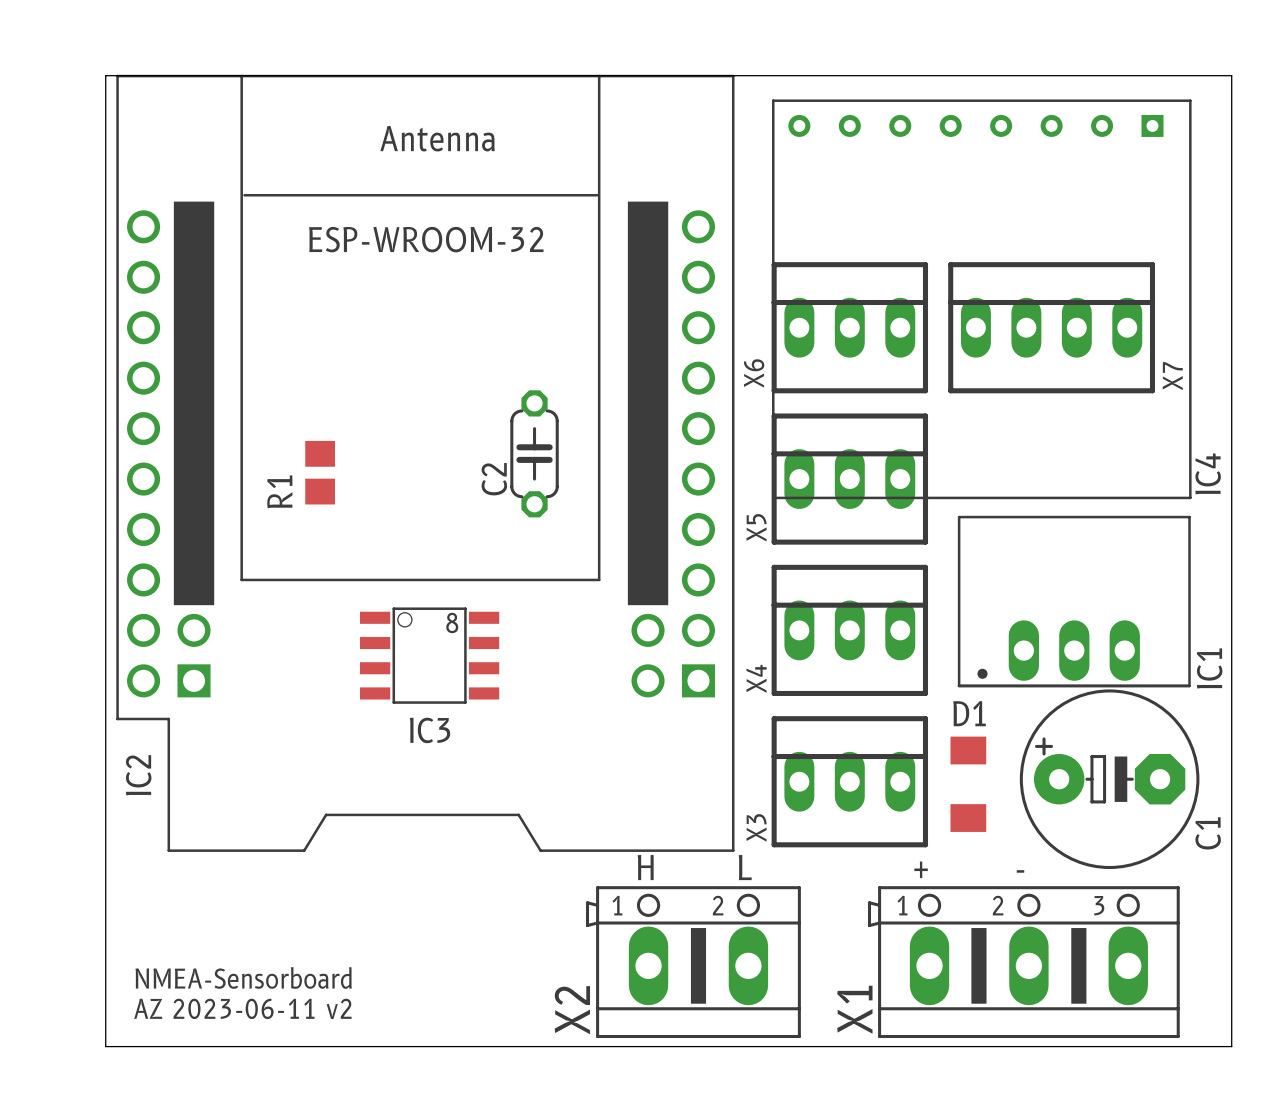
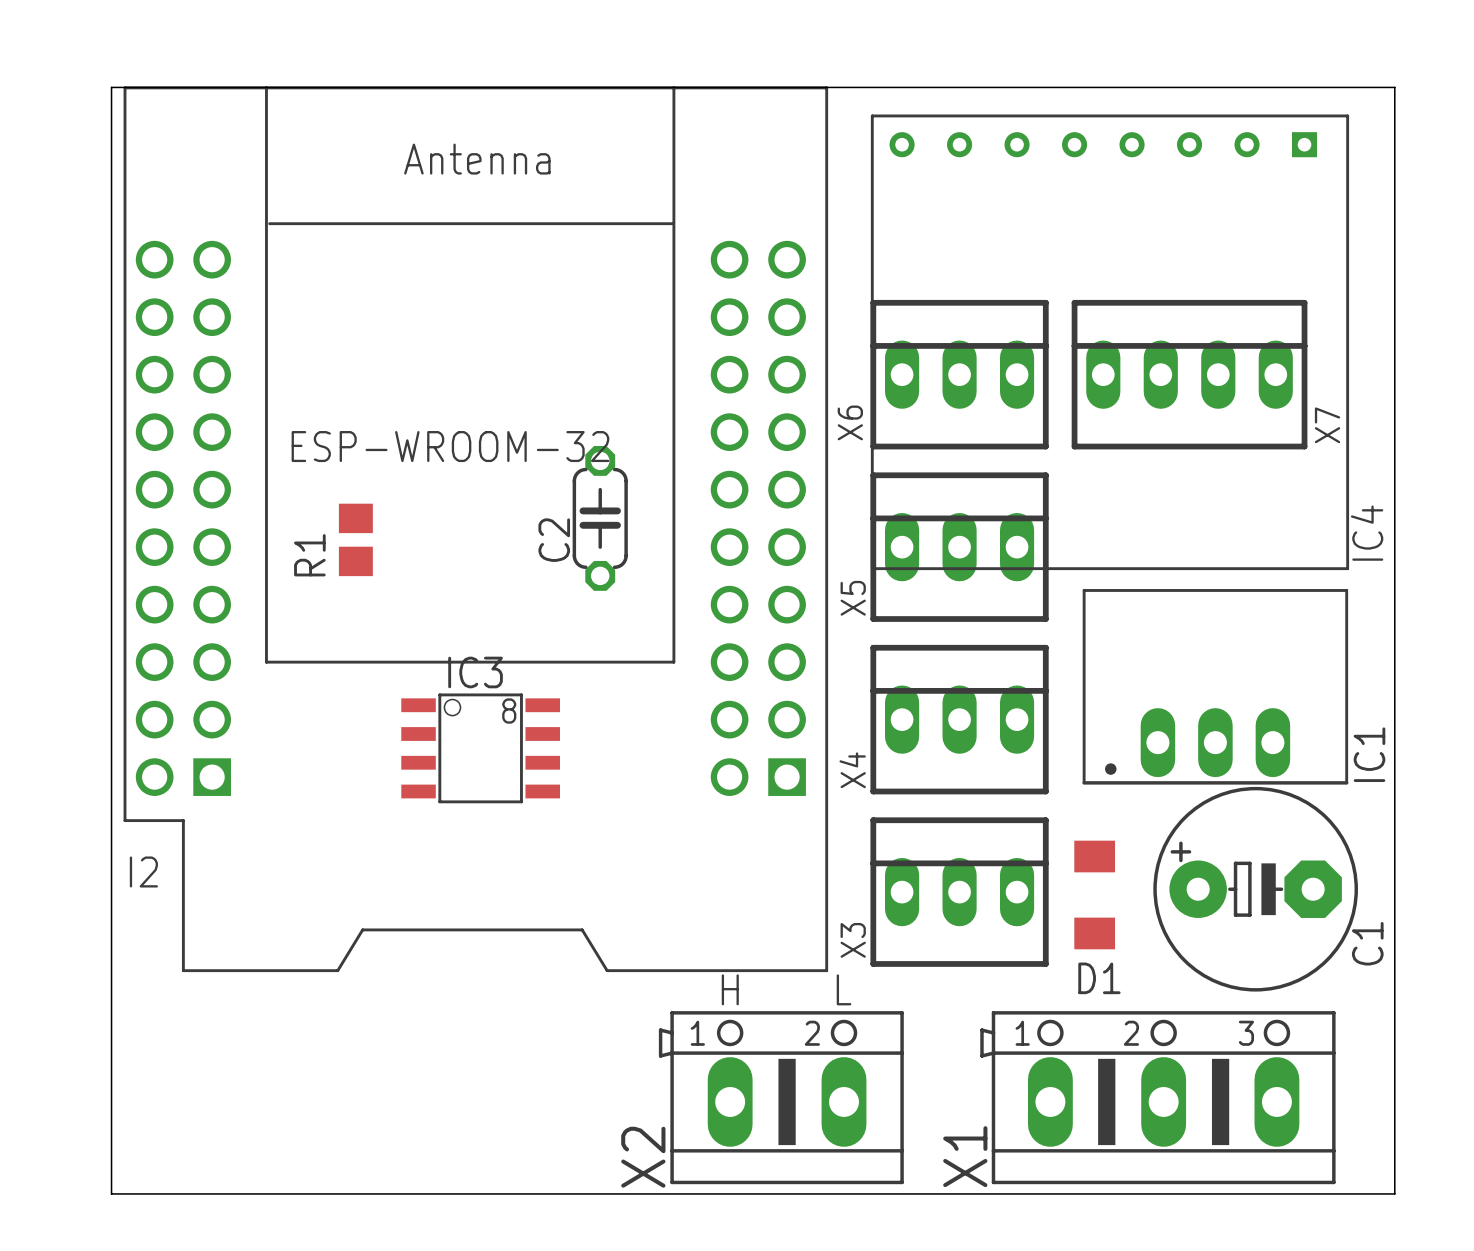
drawing: [173, 201, 215, 606] -> none
drawing: [627, 201, 669, 606] -> none
IC2 text position: ESP-WROOM-32 (426, 239) -> ESP-WROOM-32 (450, 446)
D1 name position: D1 (969, 713) -> D1 (1099, 978)
IC3 name position: IC3 (430, 730) -> IC3 (475, 672)
IC2 name: IC2 (138, 775) -> I2 (143, 871)
text: + (921, 869) -> none
text: - (1020, 871) -> none
text: NMEA-Sensorboard (243, 977) -> none
text: AZ 2023-06-11 v2 (242, 1008) -> none

